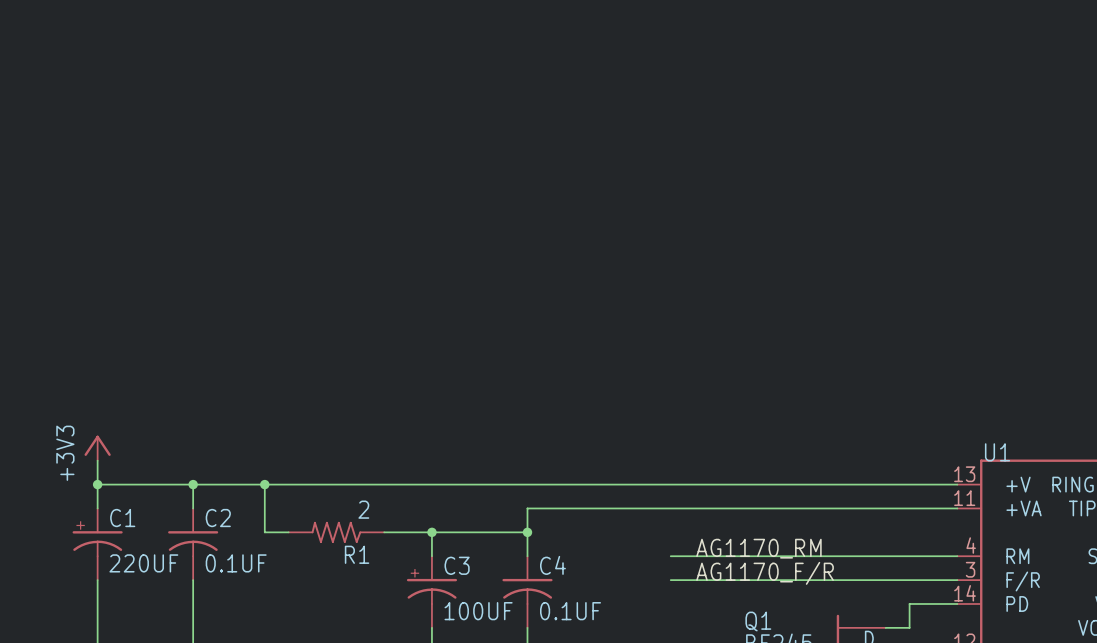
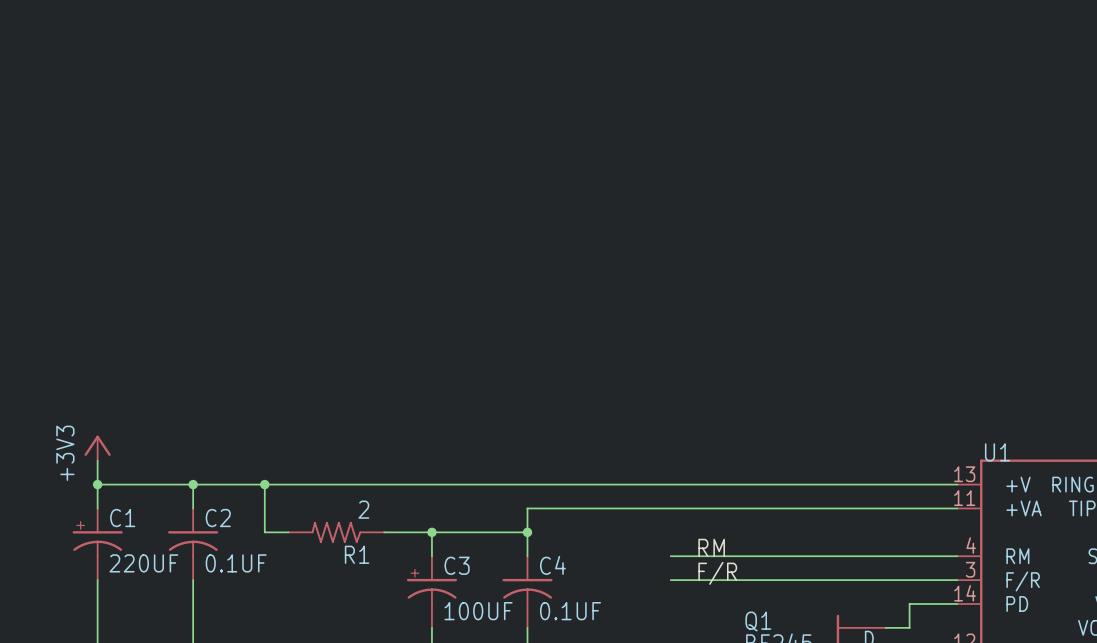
label: AG1170_RM (758, 548) -> RM (711, 547)
label: AG1170_F/R (765, 573) -> F/R (717, 573)

